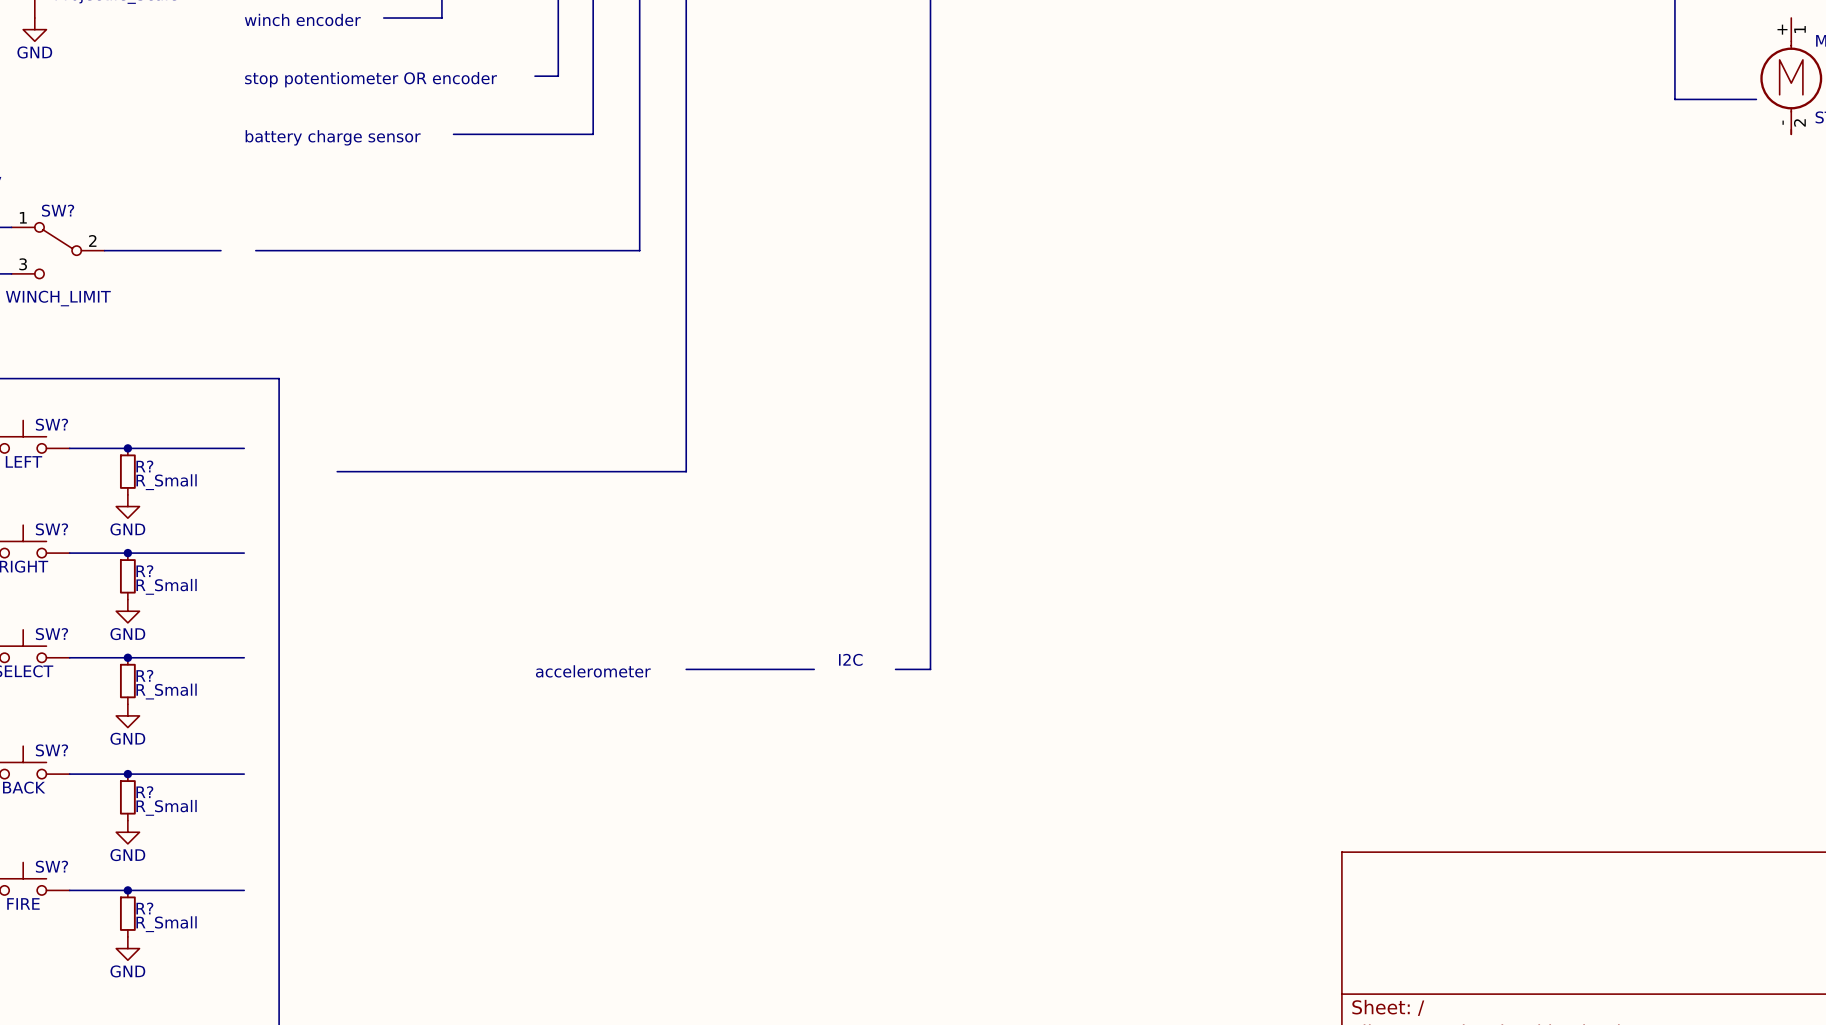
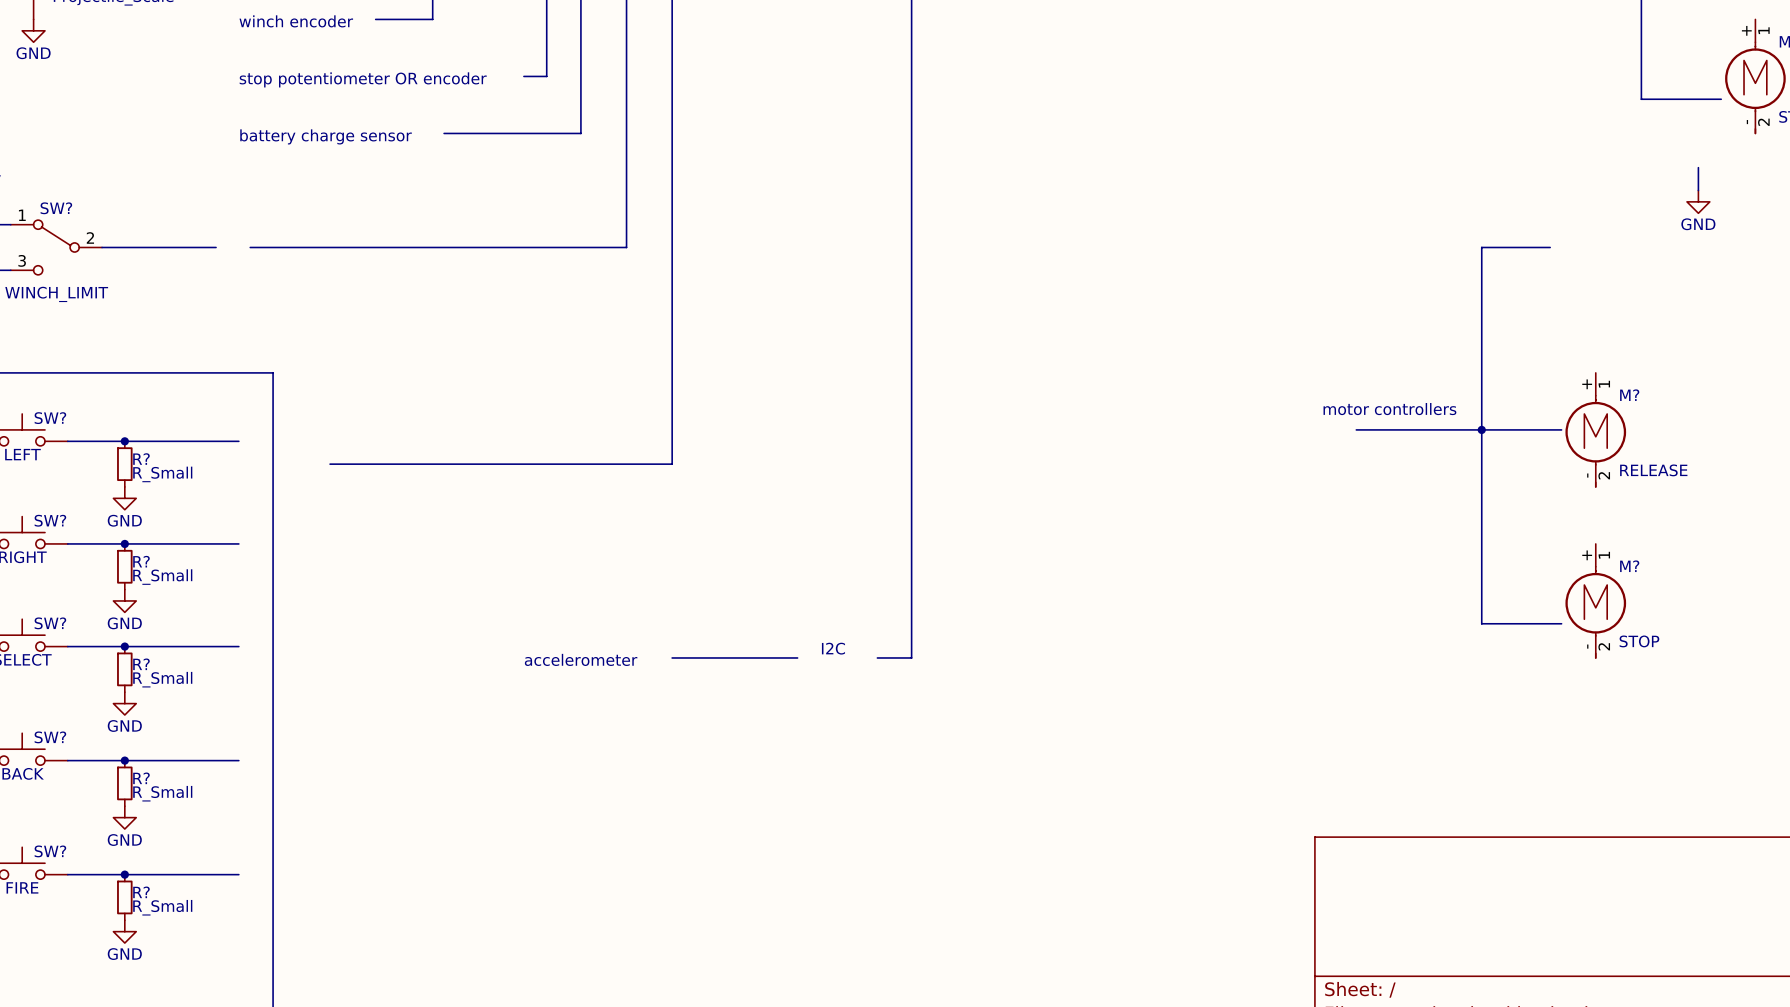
wire: none -> (1698, 167) (1698, 190)
power symbol: none -> GND (1698, 201)
bus: none -> (1550, 247) (1481, 247) (1481, 623) (1561, 623)
text: none -> motor controllers (1389, 409)
bus: none -> (1356, 429) (1561, 429)
junction: none -> (1481, 429)
M?: none -> RELEASE (1595, 429)
M?: none -> STOP (1595, 600)

